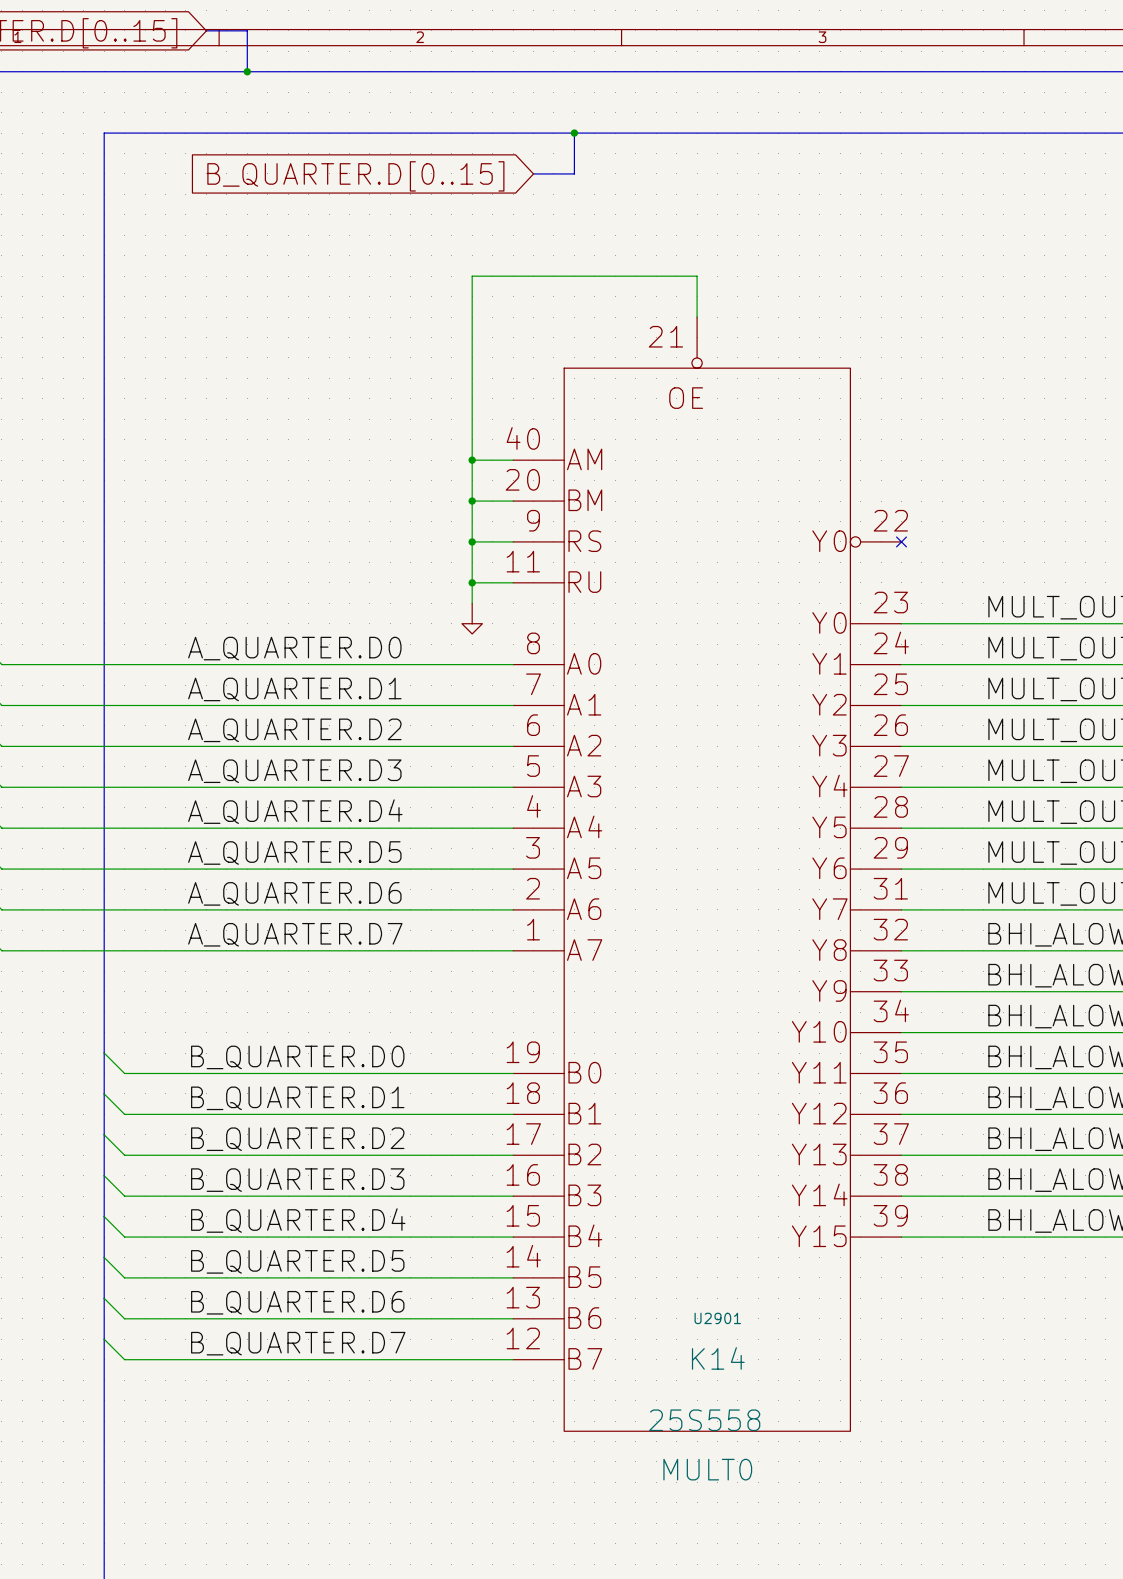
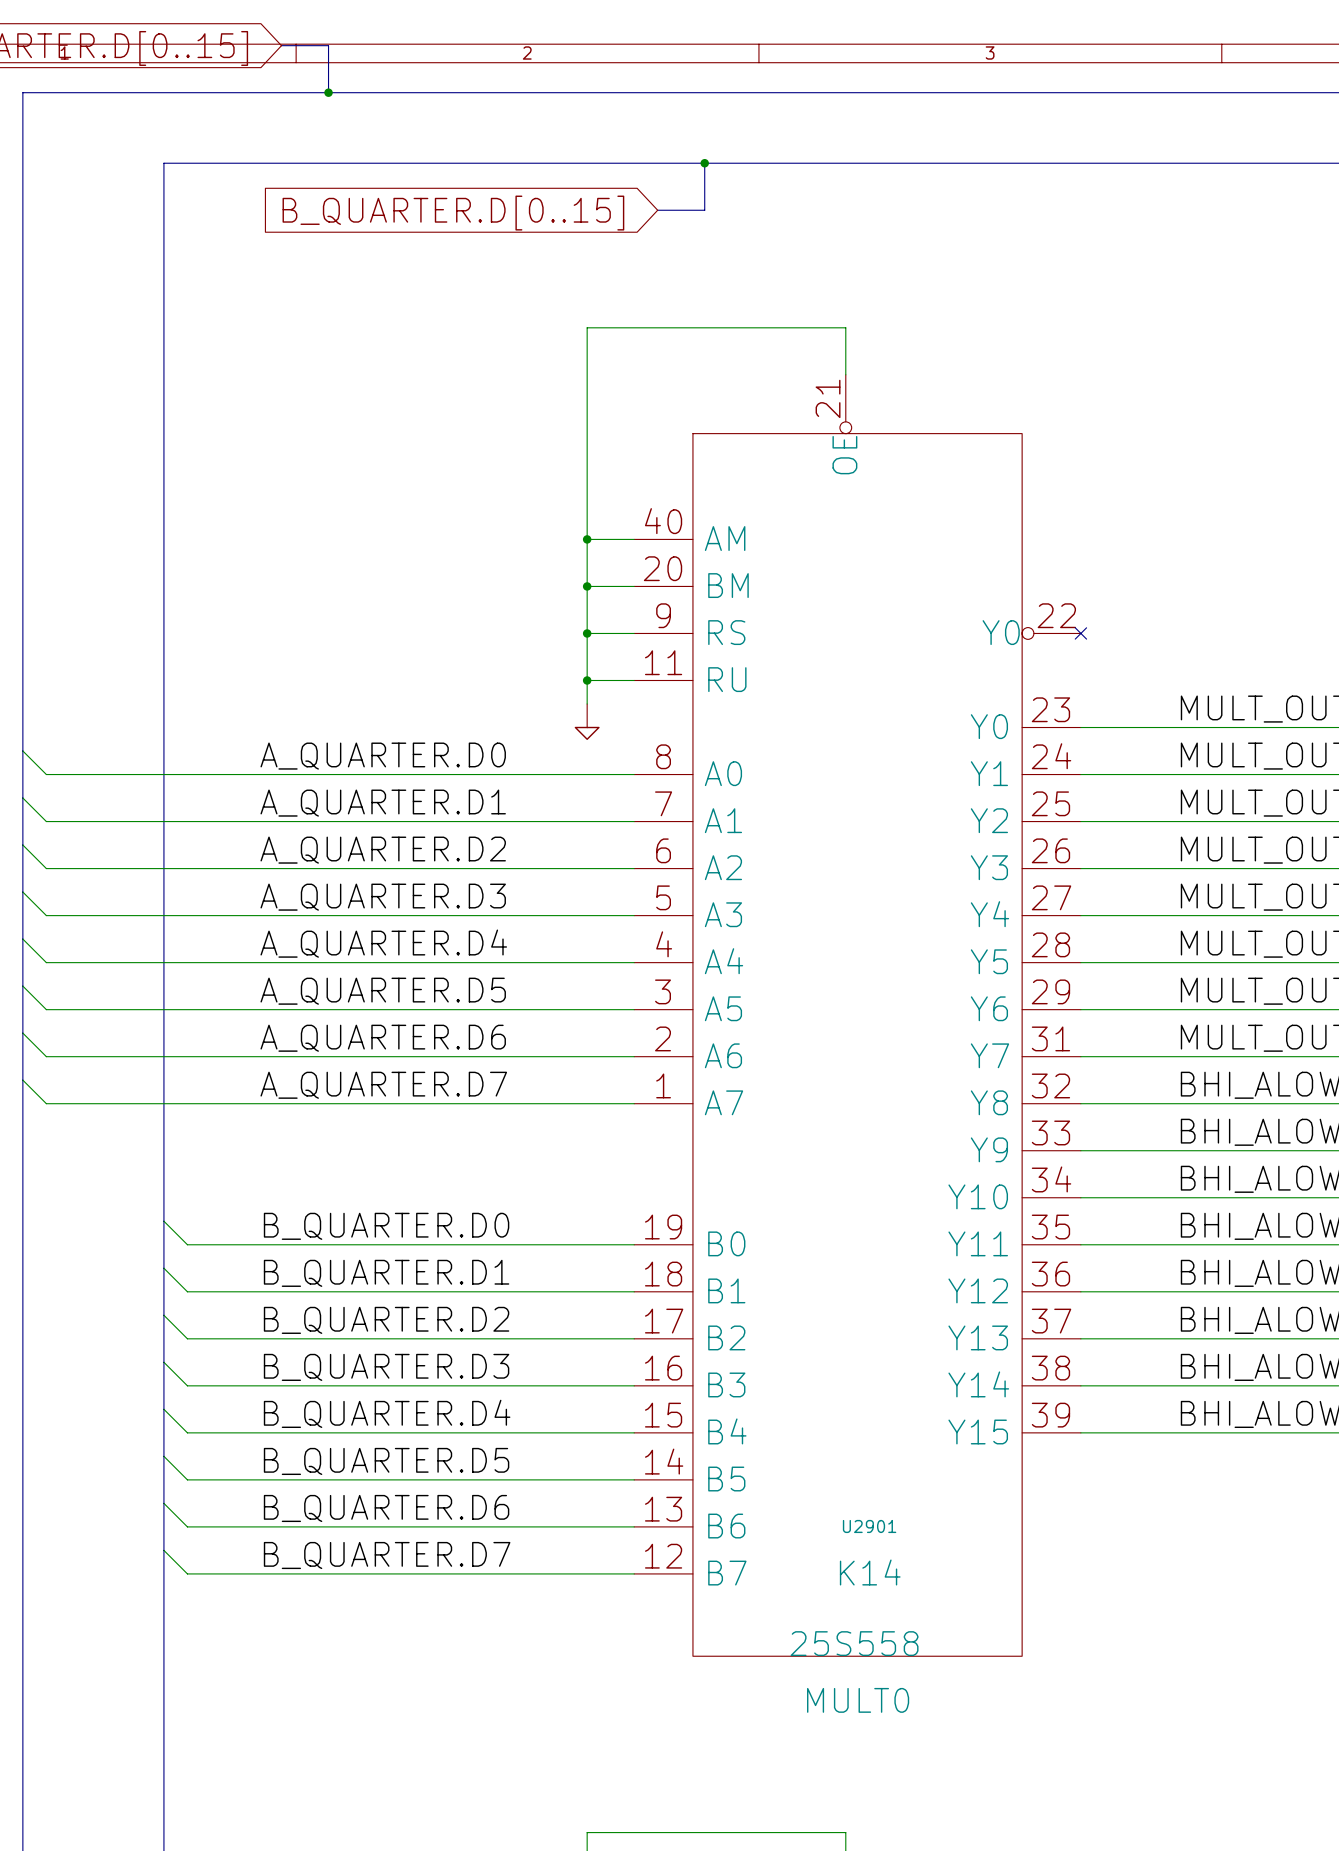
U2901 symbol: [513, 317, 902, 1432] -> [634, 374, 1081, 1657]

